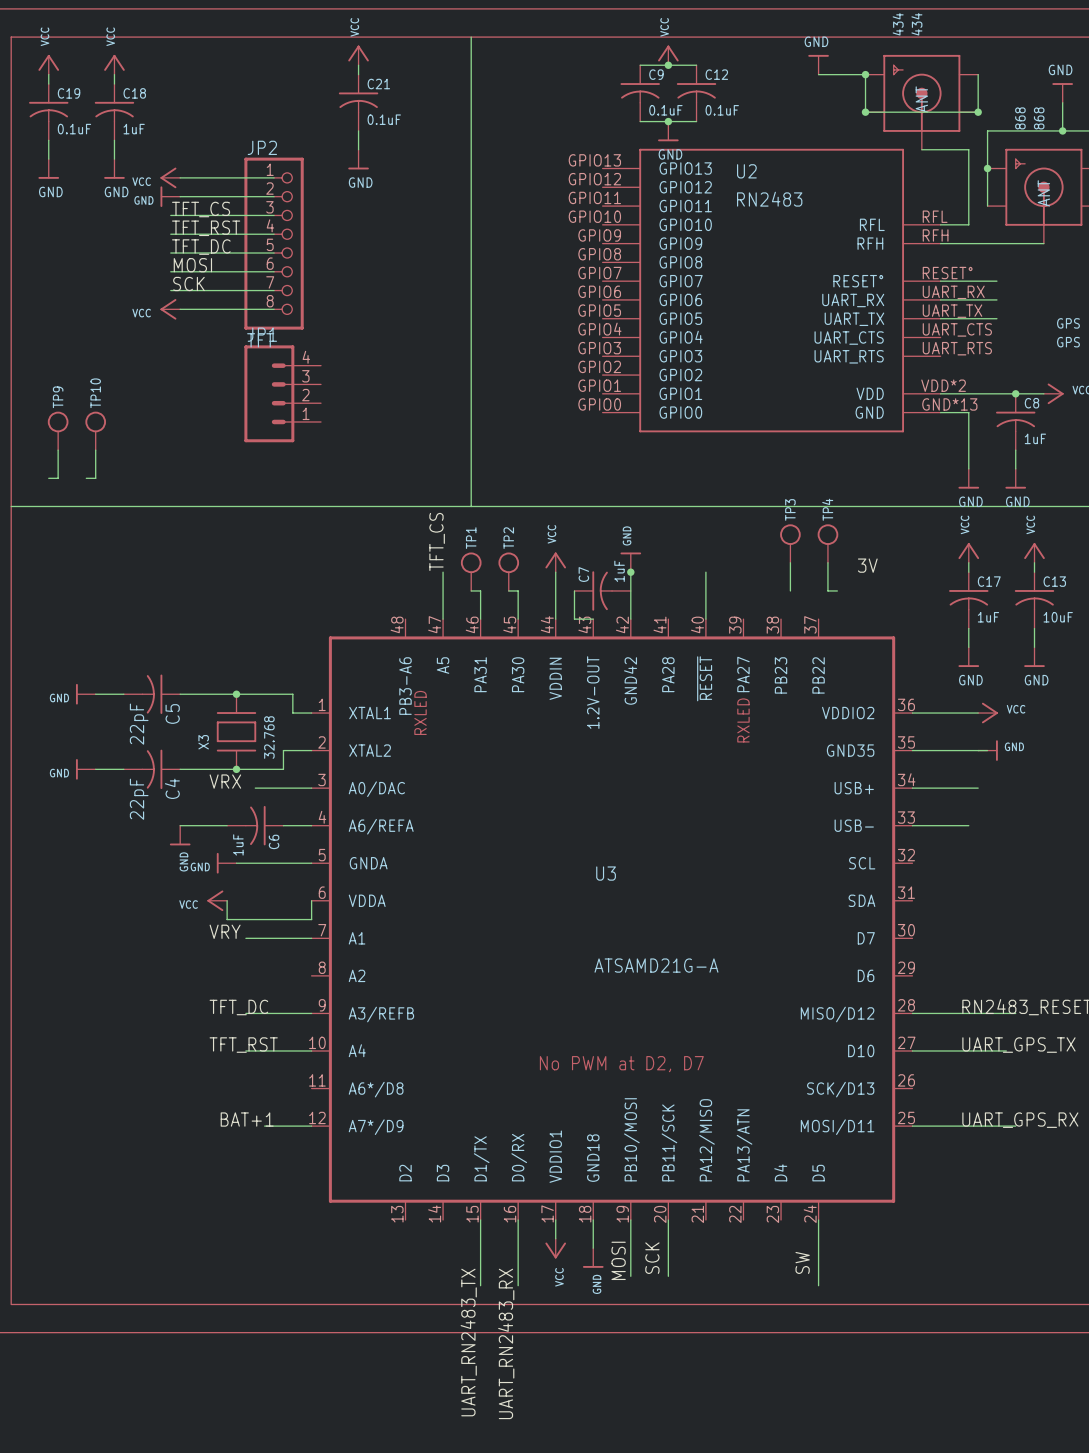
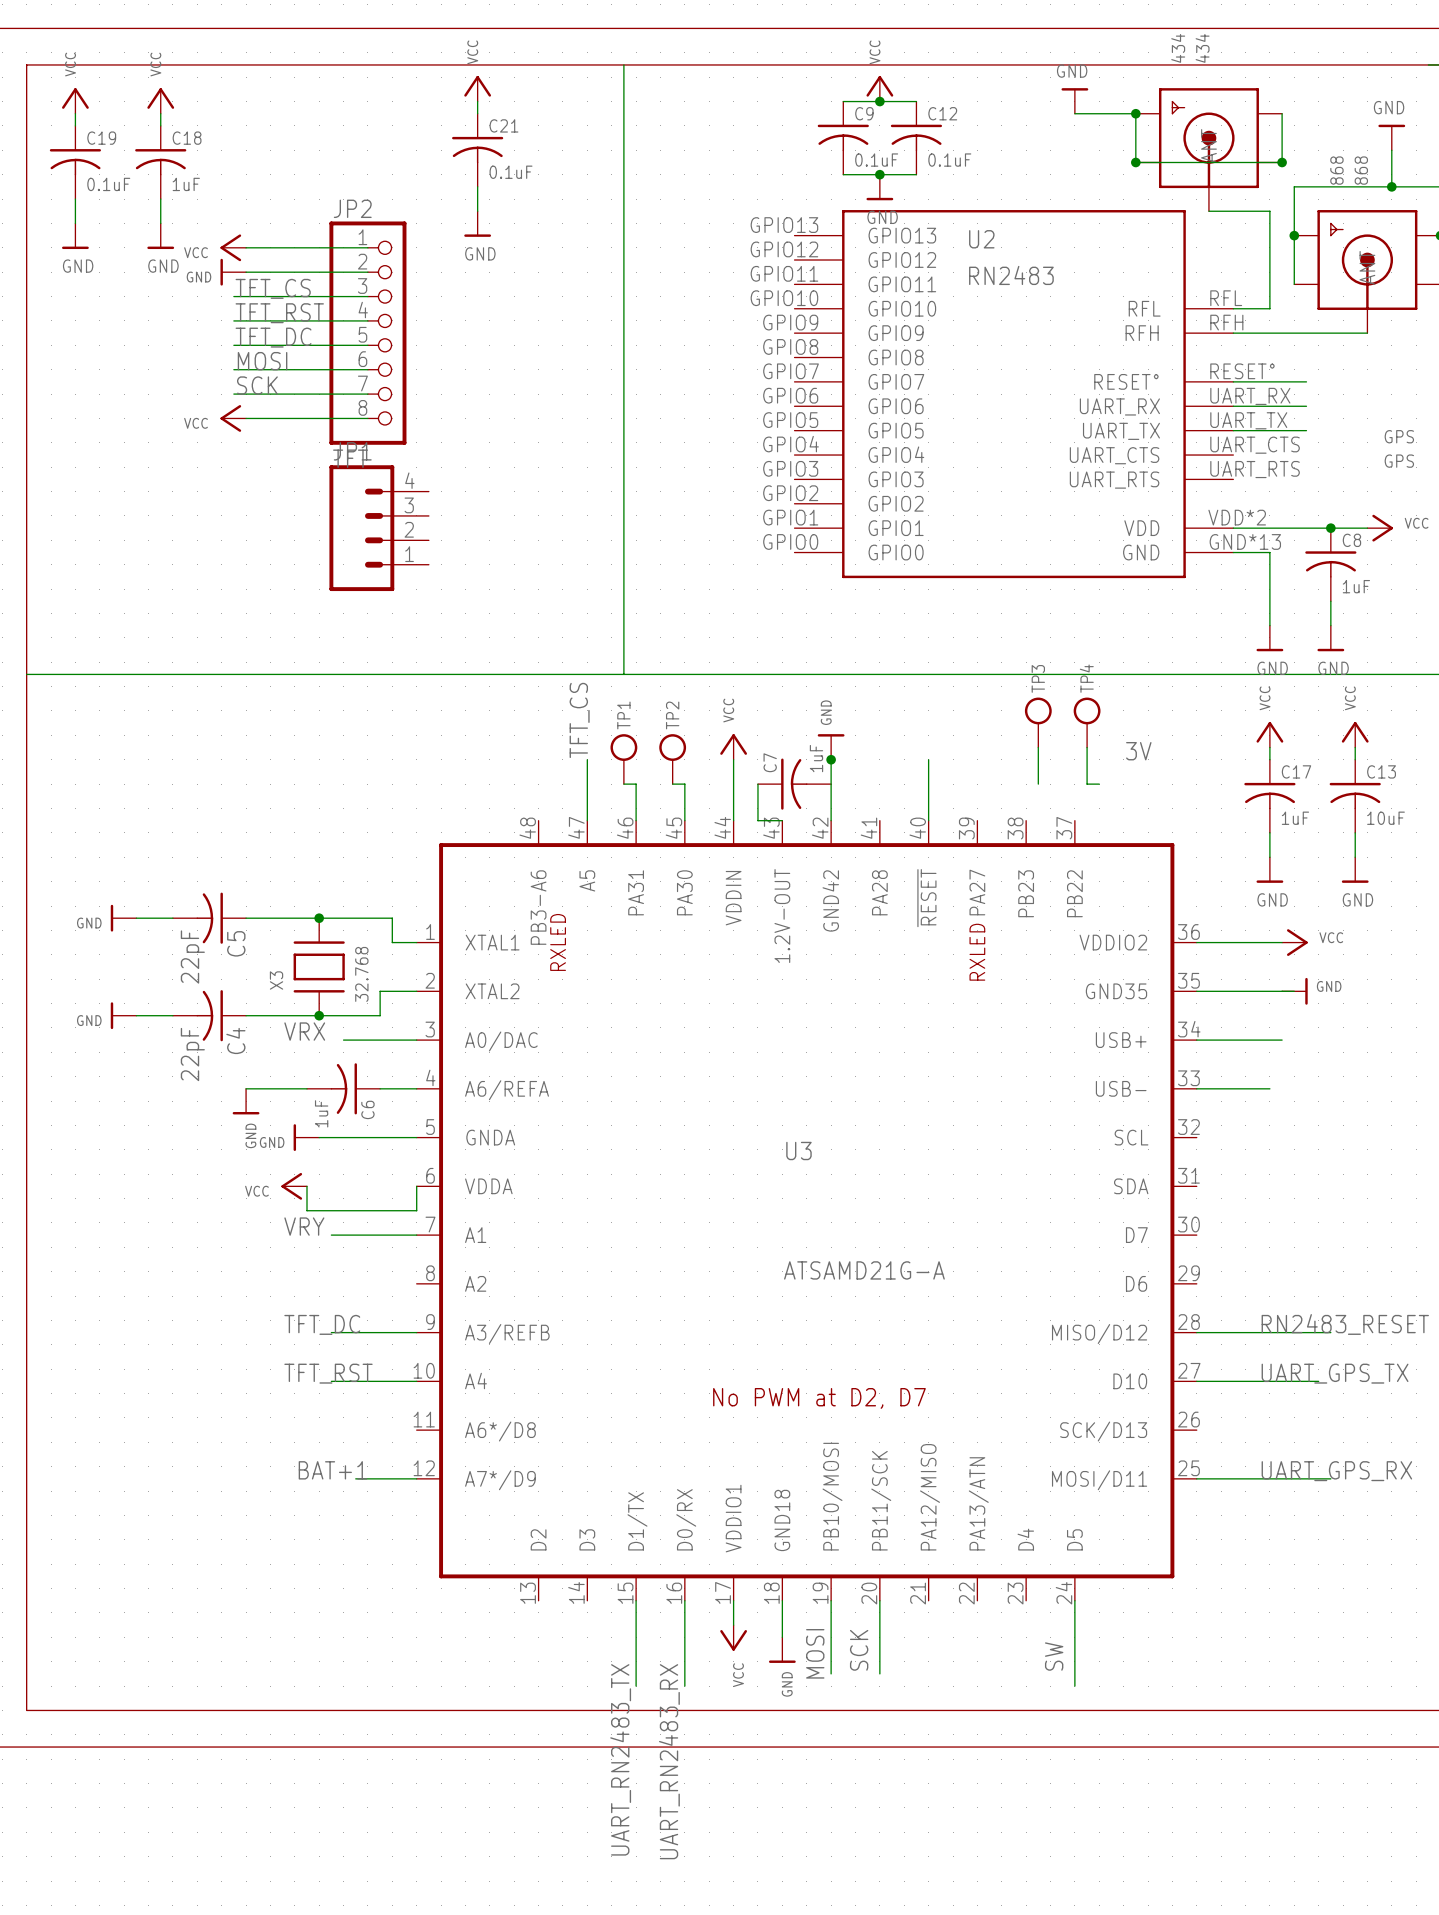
TP9: (58, 430) -> none
TP10: (95, 430) -> none
wire: (58, 450) (58, 478) (48, 478) -> none
wire: (95, 450) (95, 478) (86, 478) -> none

